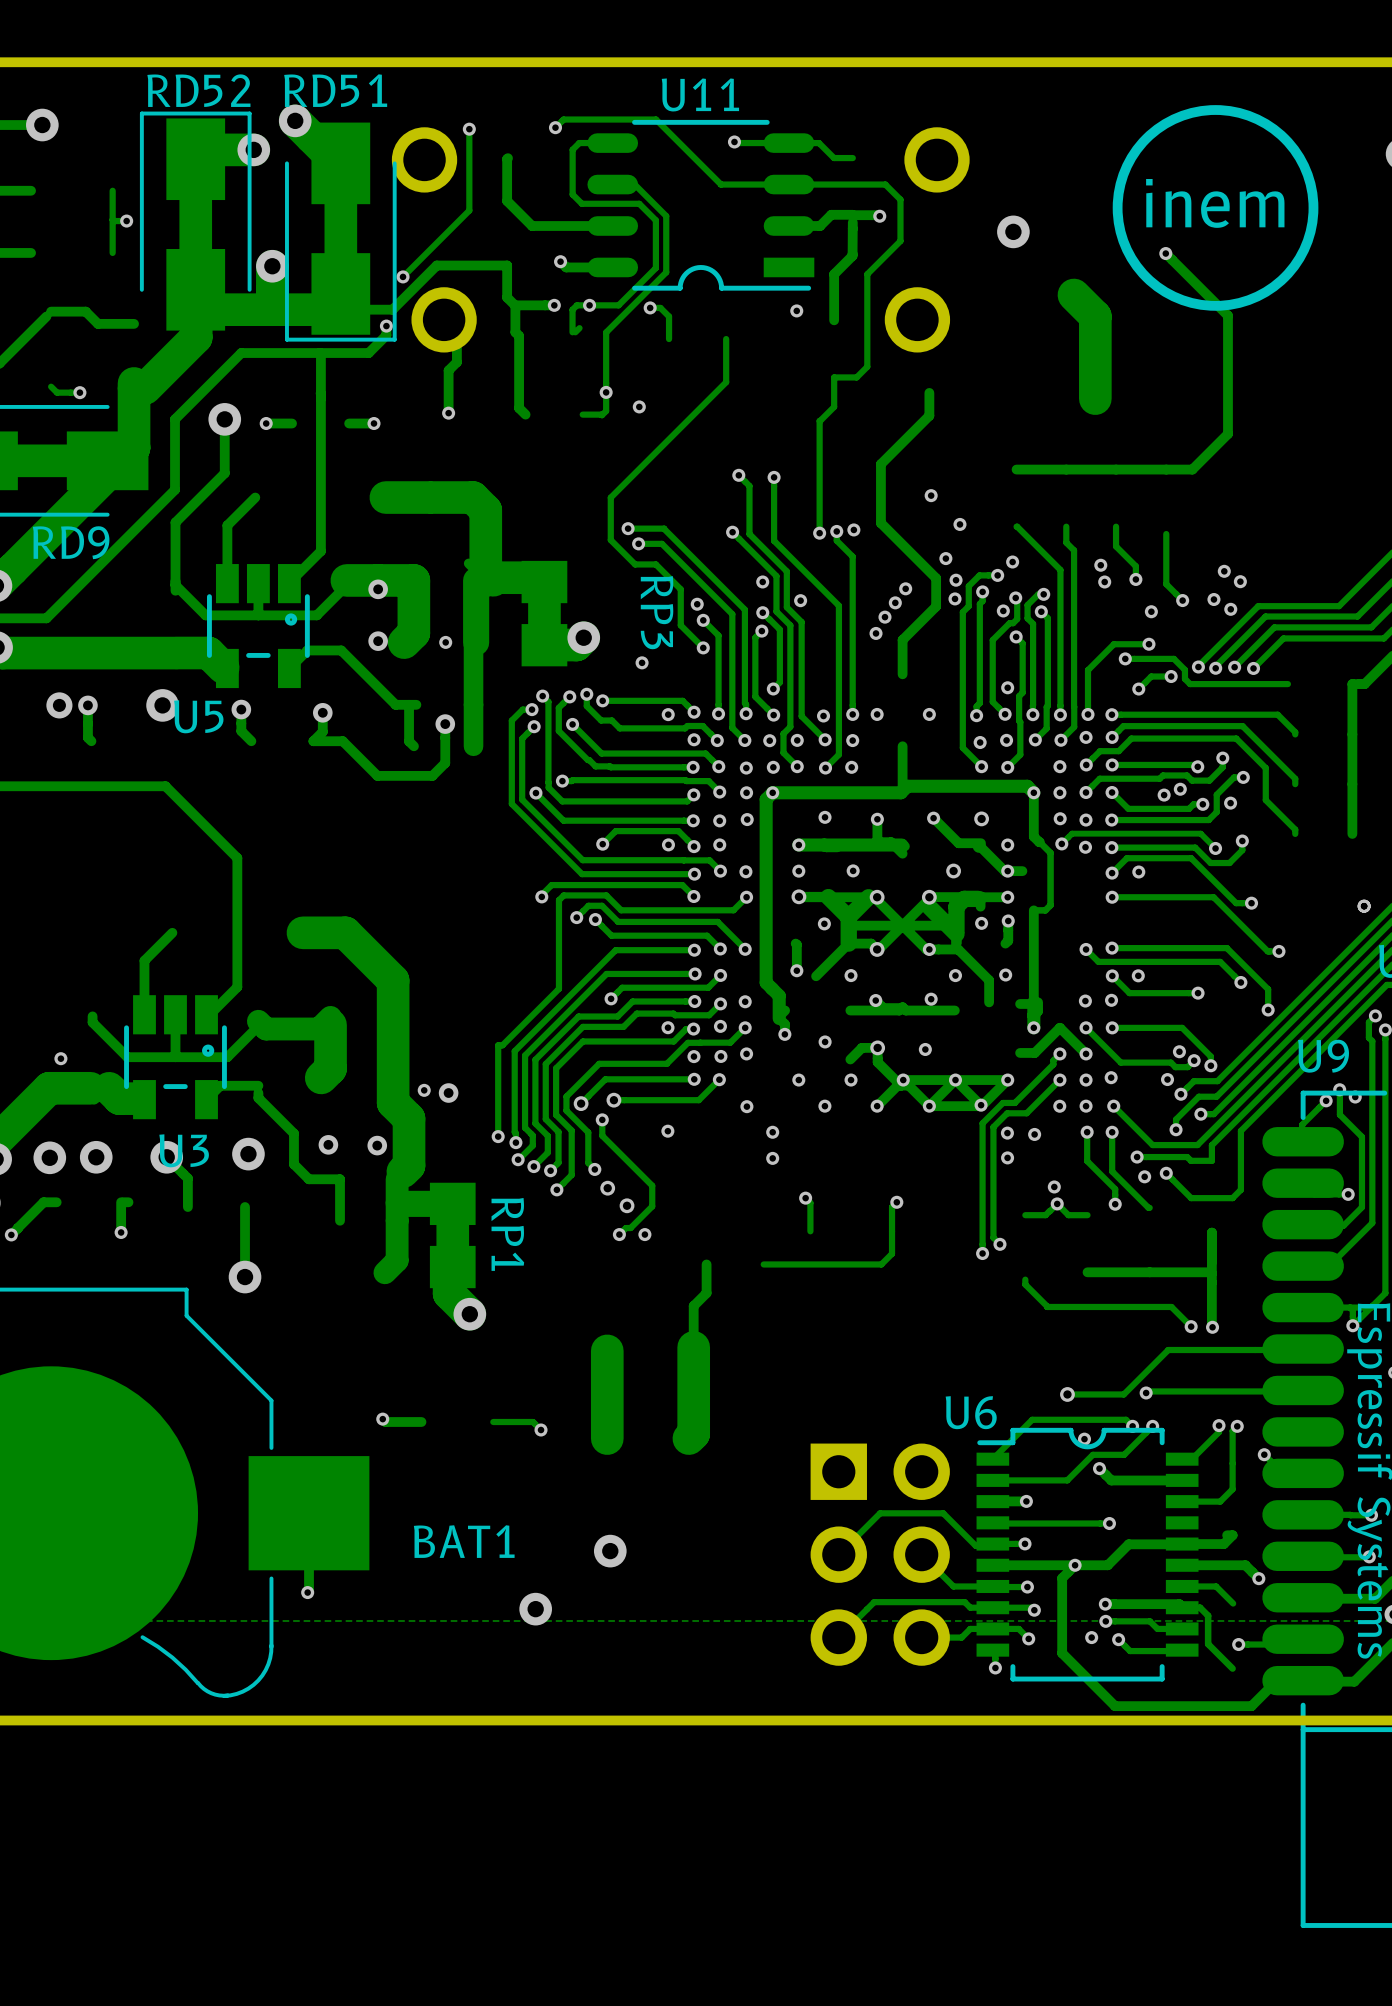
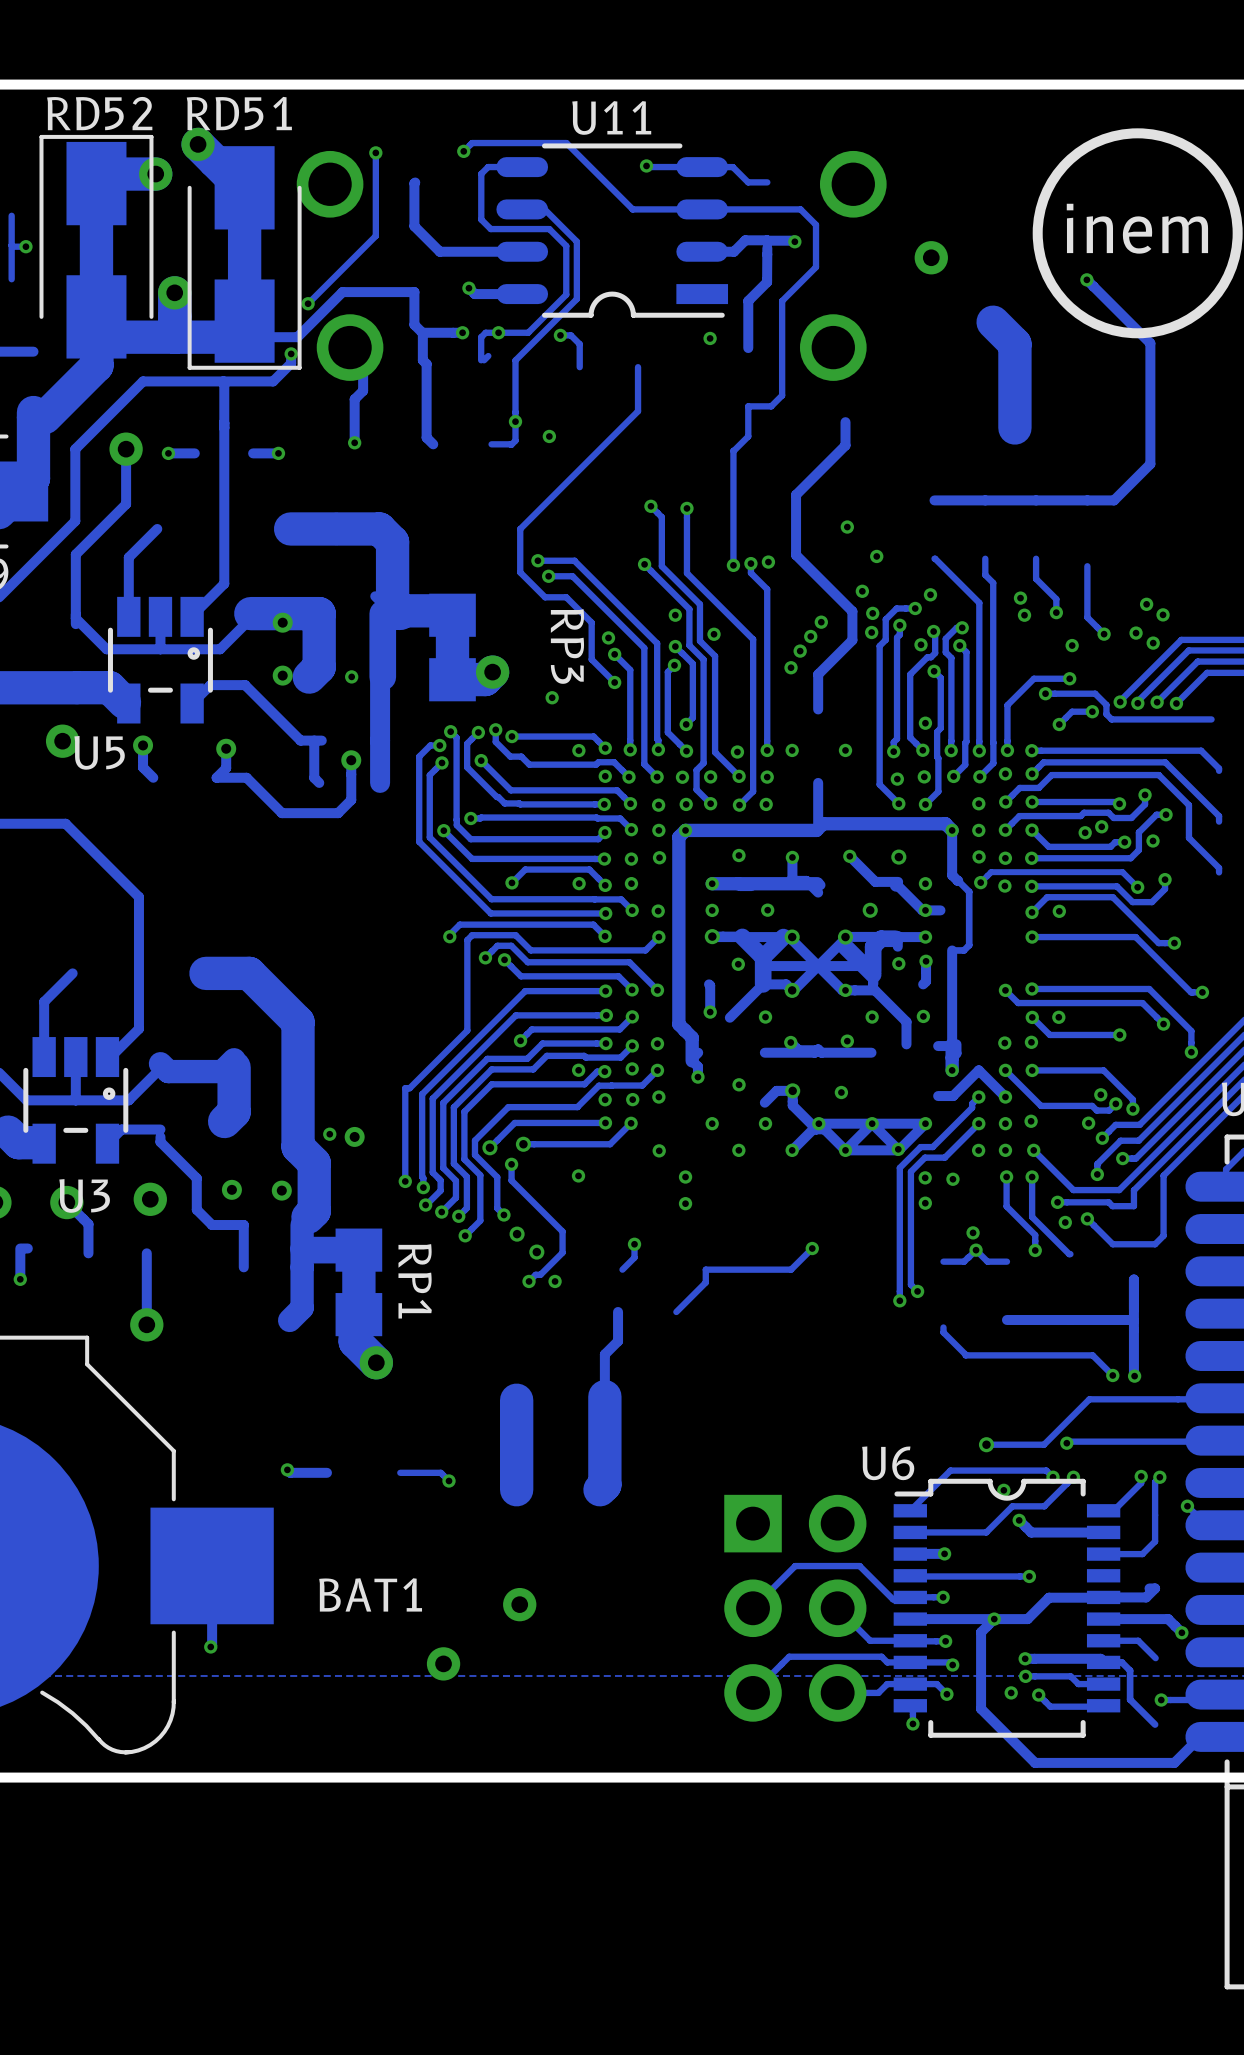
track: none -> (634, 1244) (634, 1257) (622, 1269)
track: (805, 1198) (810, 1202) (810, 1231) -> none
via position: (805, 1198) -> (634, 1244)
track: (892, 1207) (892, 1253) (881, 1264) (763, 1264) -> (807, 1253) (791, 1269) (705, 1269) (705, 1282) (676, 1311)

